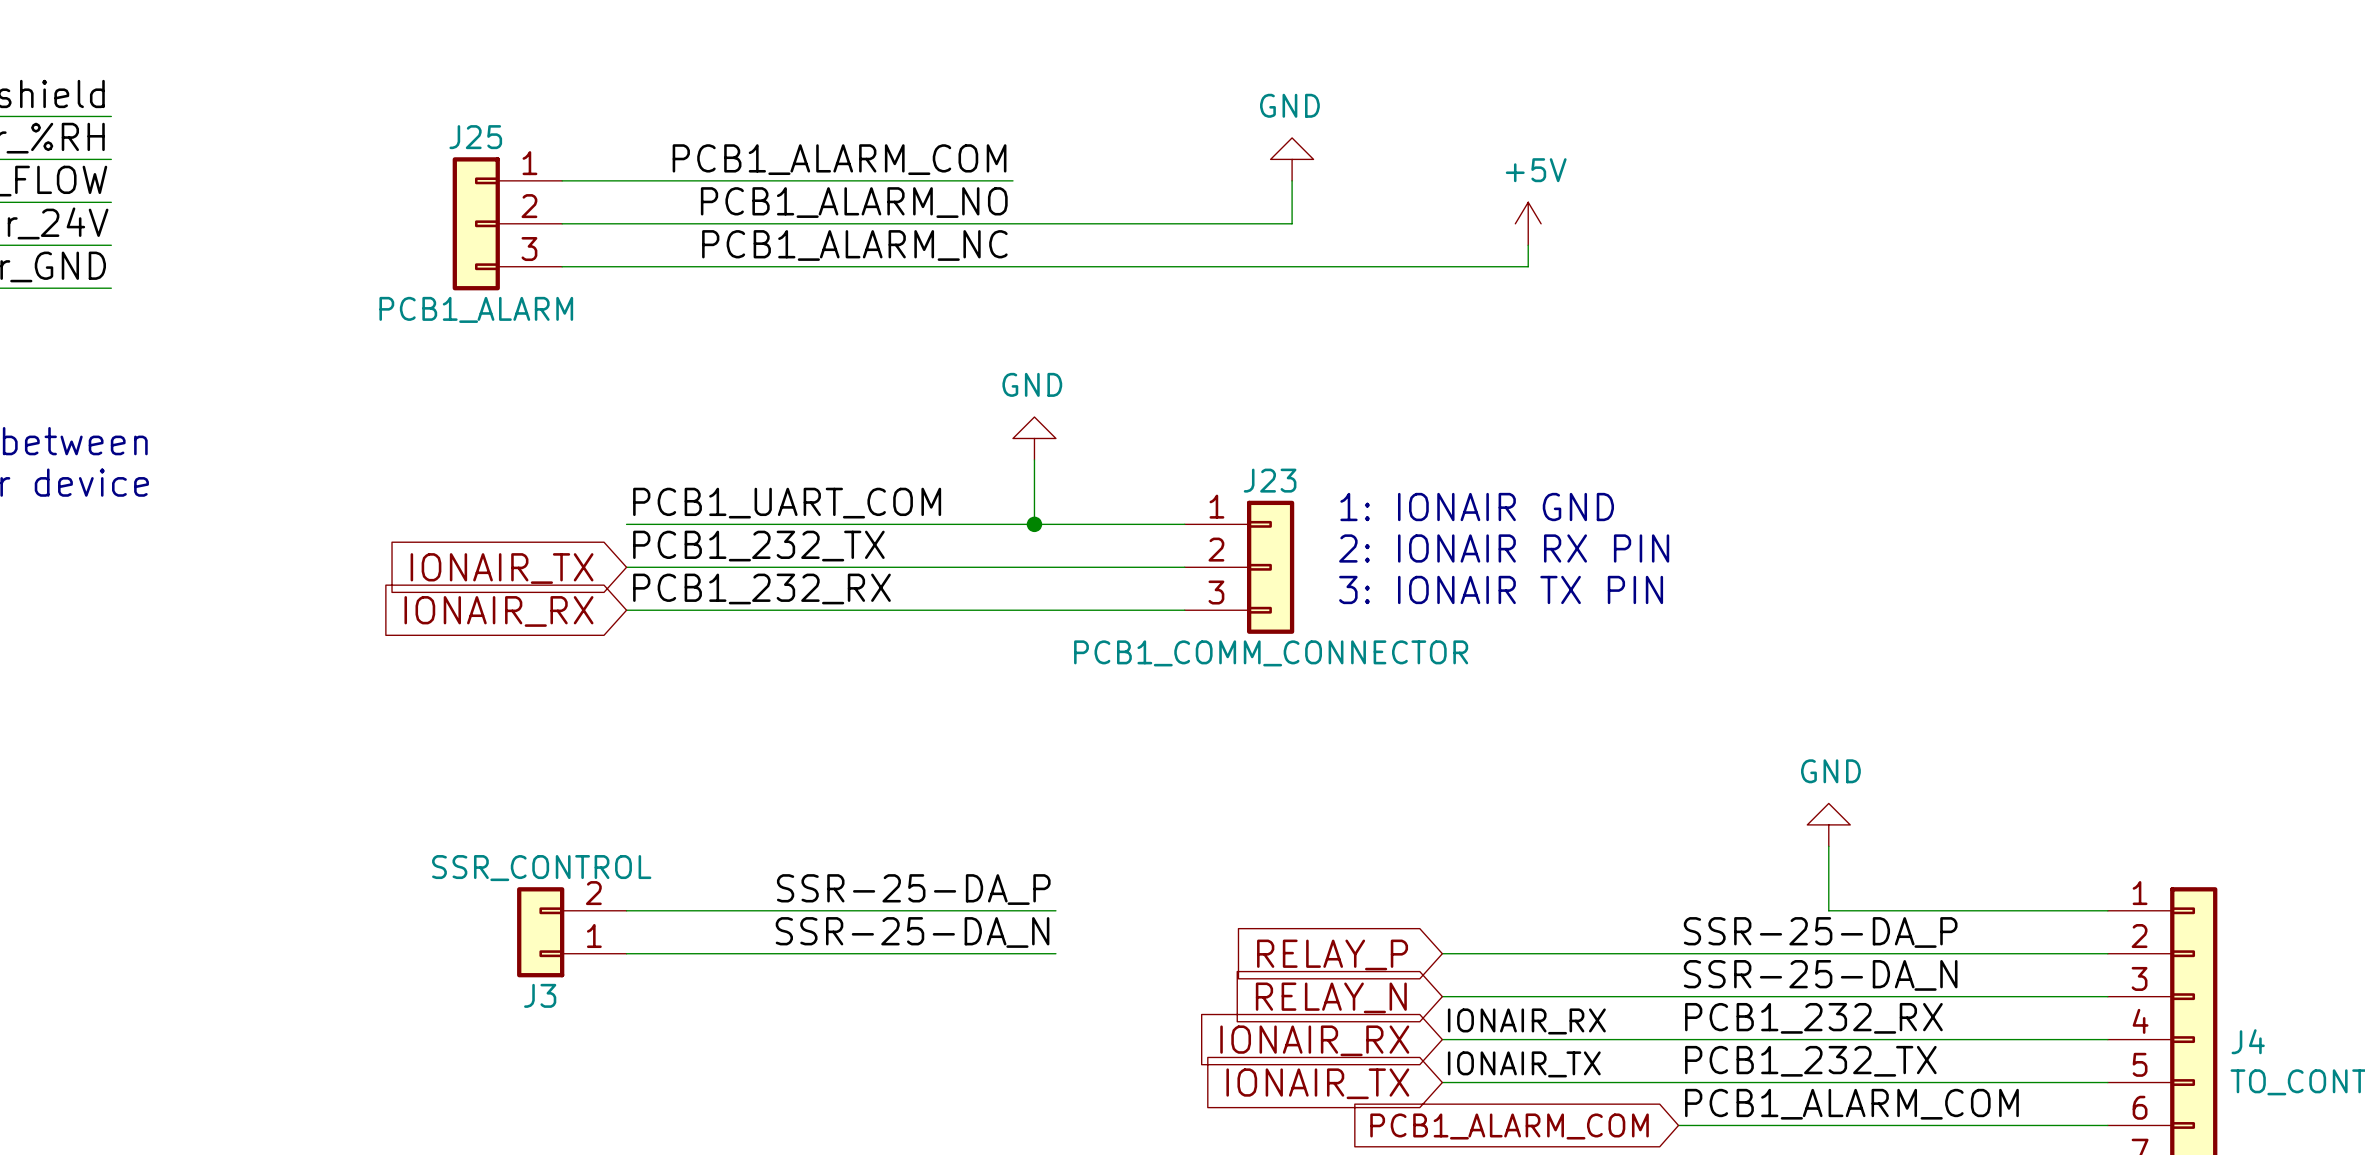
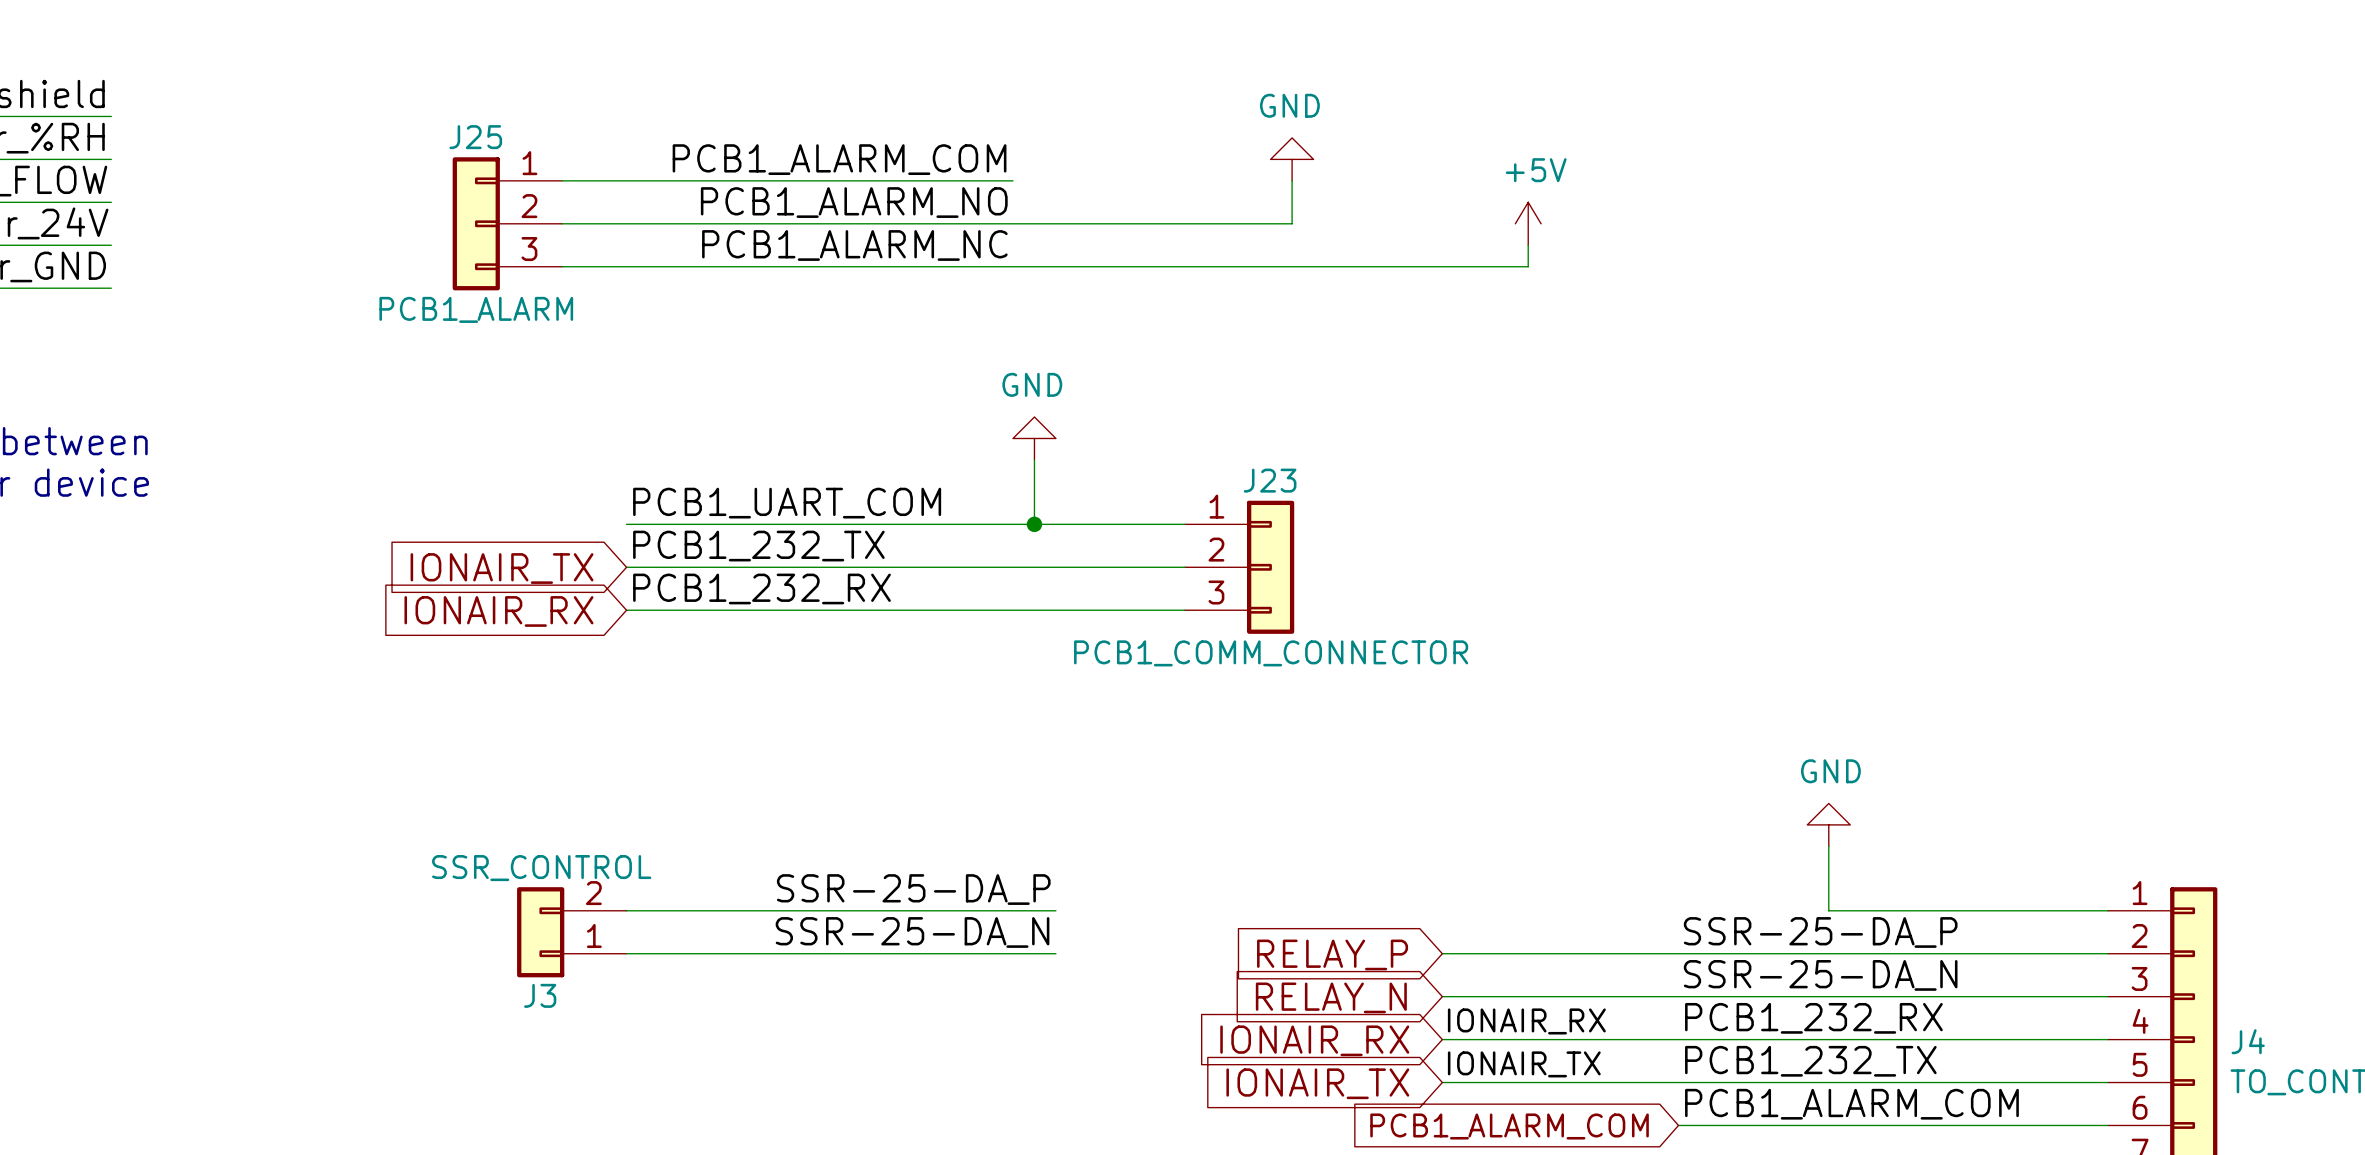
text: 1: IONAIR GND (1477, 507) -> none
text: 2: IONAIR RX PIN (1504, 548) -> none
text: 3: IONAIR TX PIN (1501, 589) -> none

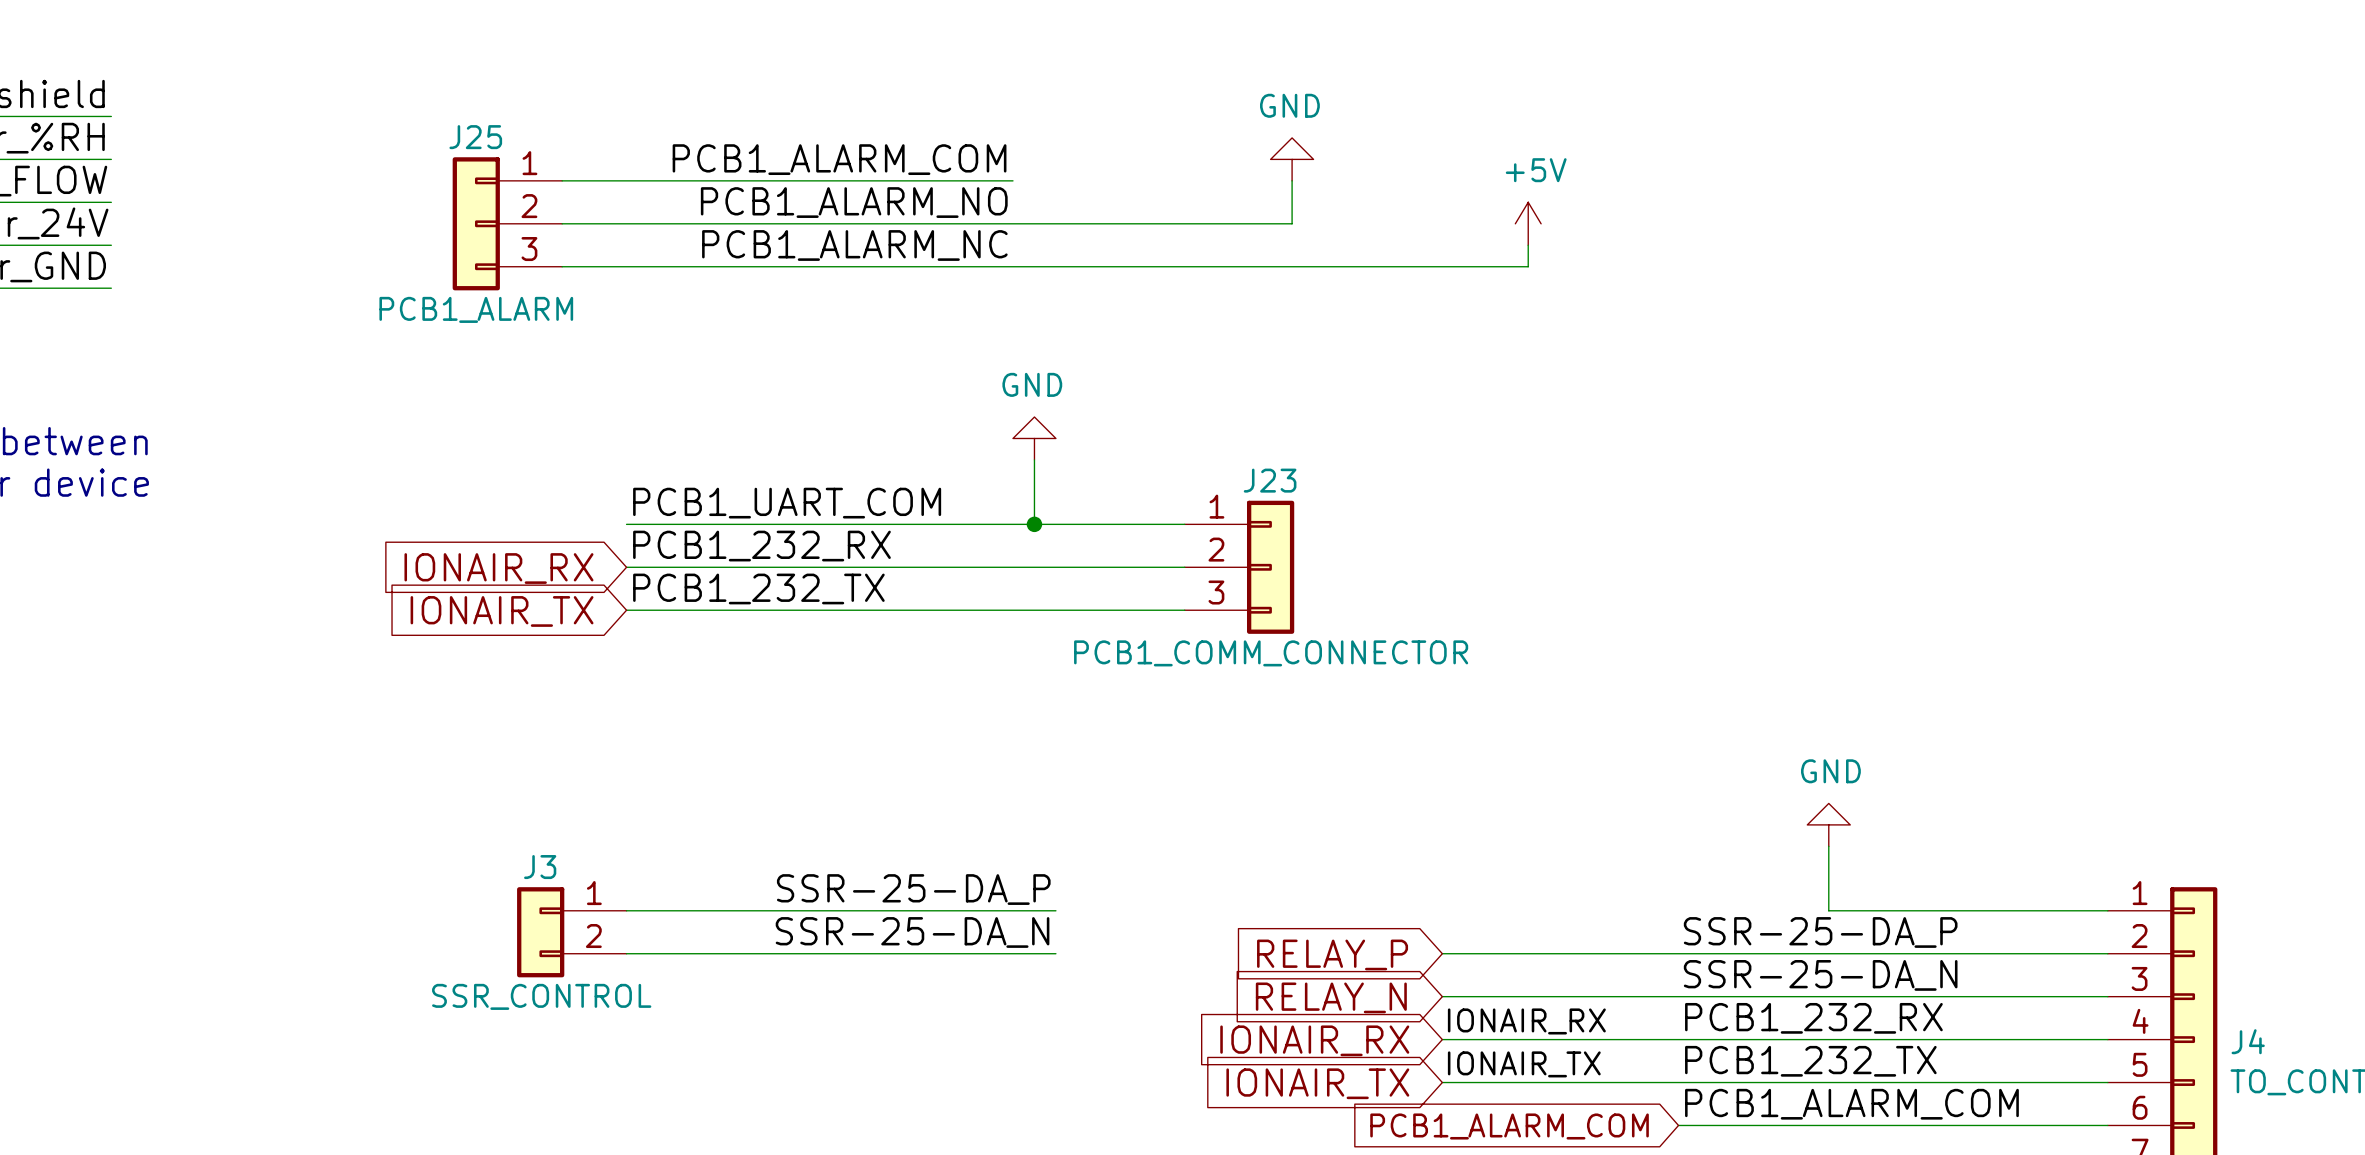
label: PCB1_232_TX (758, 546) -> PCB1_232_RX (761, 546)
global label: IONAIR_TX (502, 568) -> IONAIR_RX (498, 568)
label: PCB1_232_RX (761, 588) -> PCB1_232_TX (758, 588)
global label: IONAIR_RX (498, 611) -> IONAIR_TX (502, 611)
J3 flip: as is (540, 932) -> up-down (540, 932)

